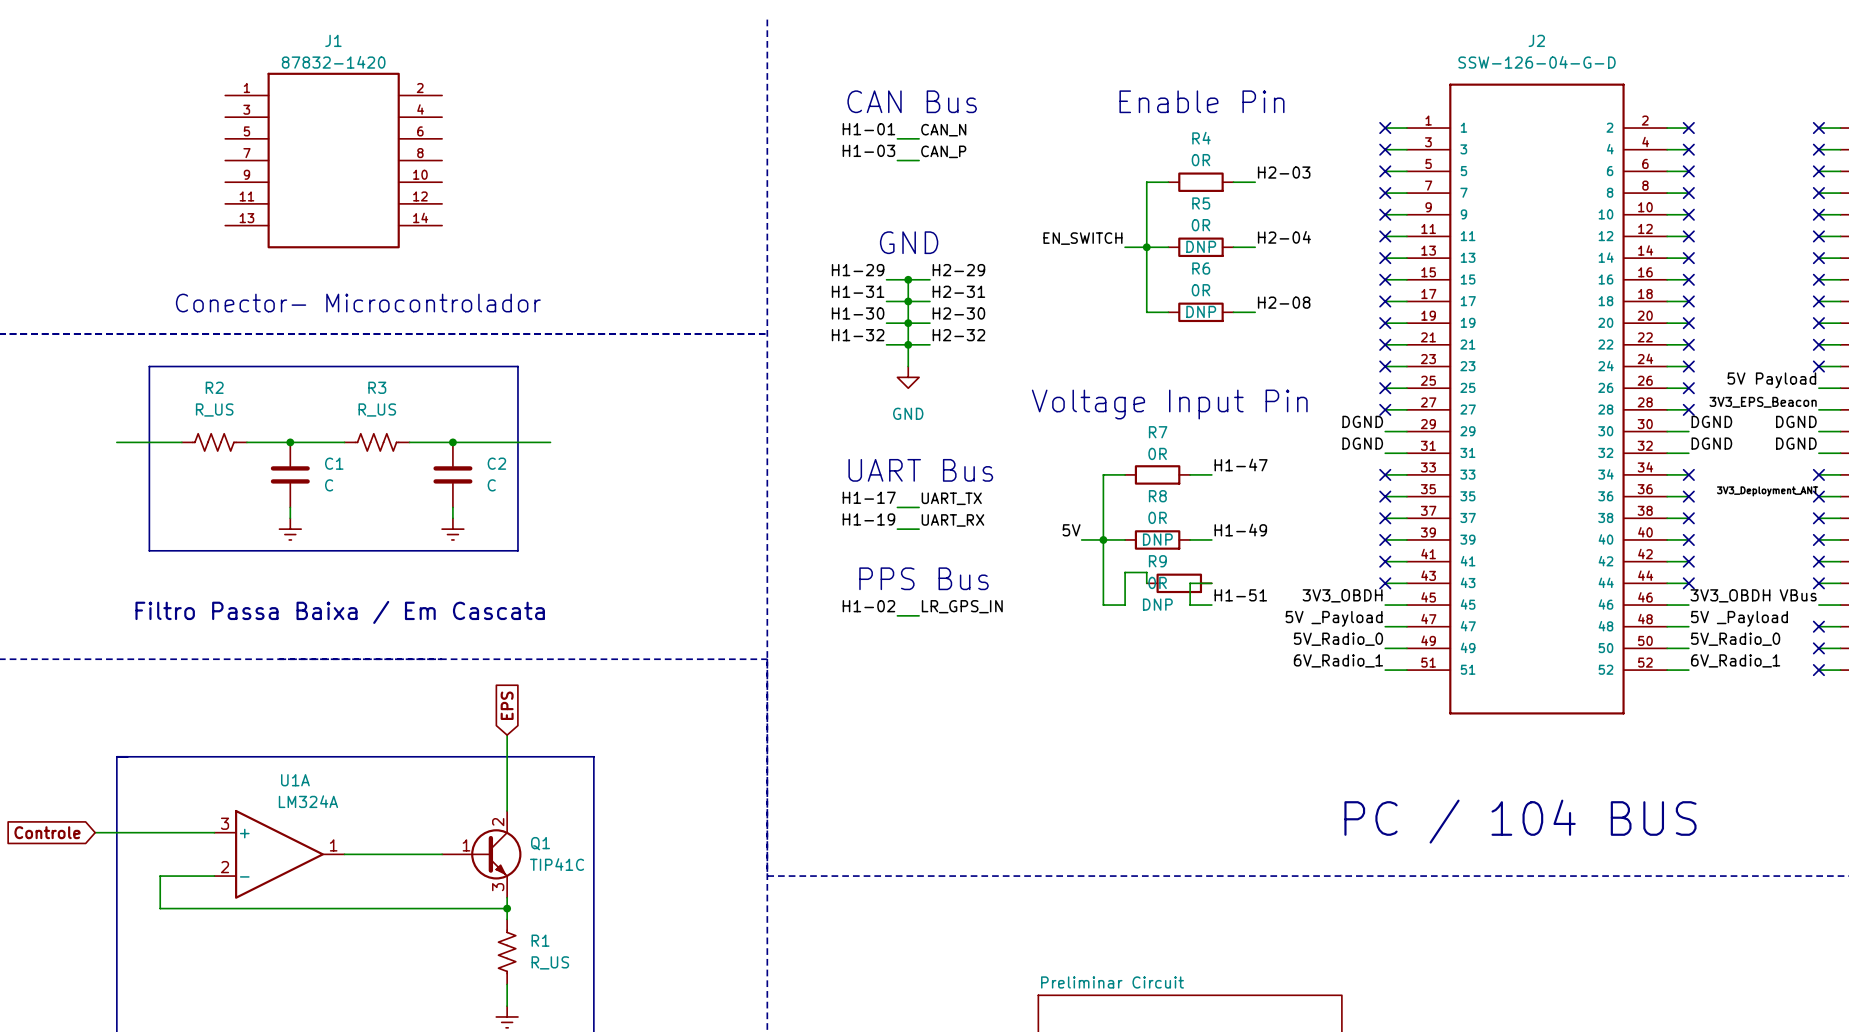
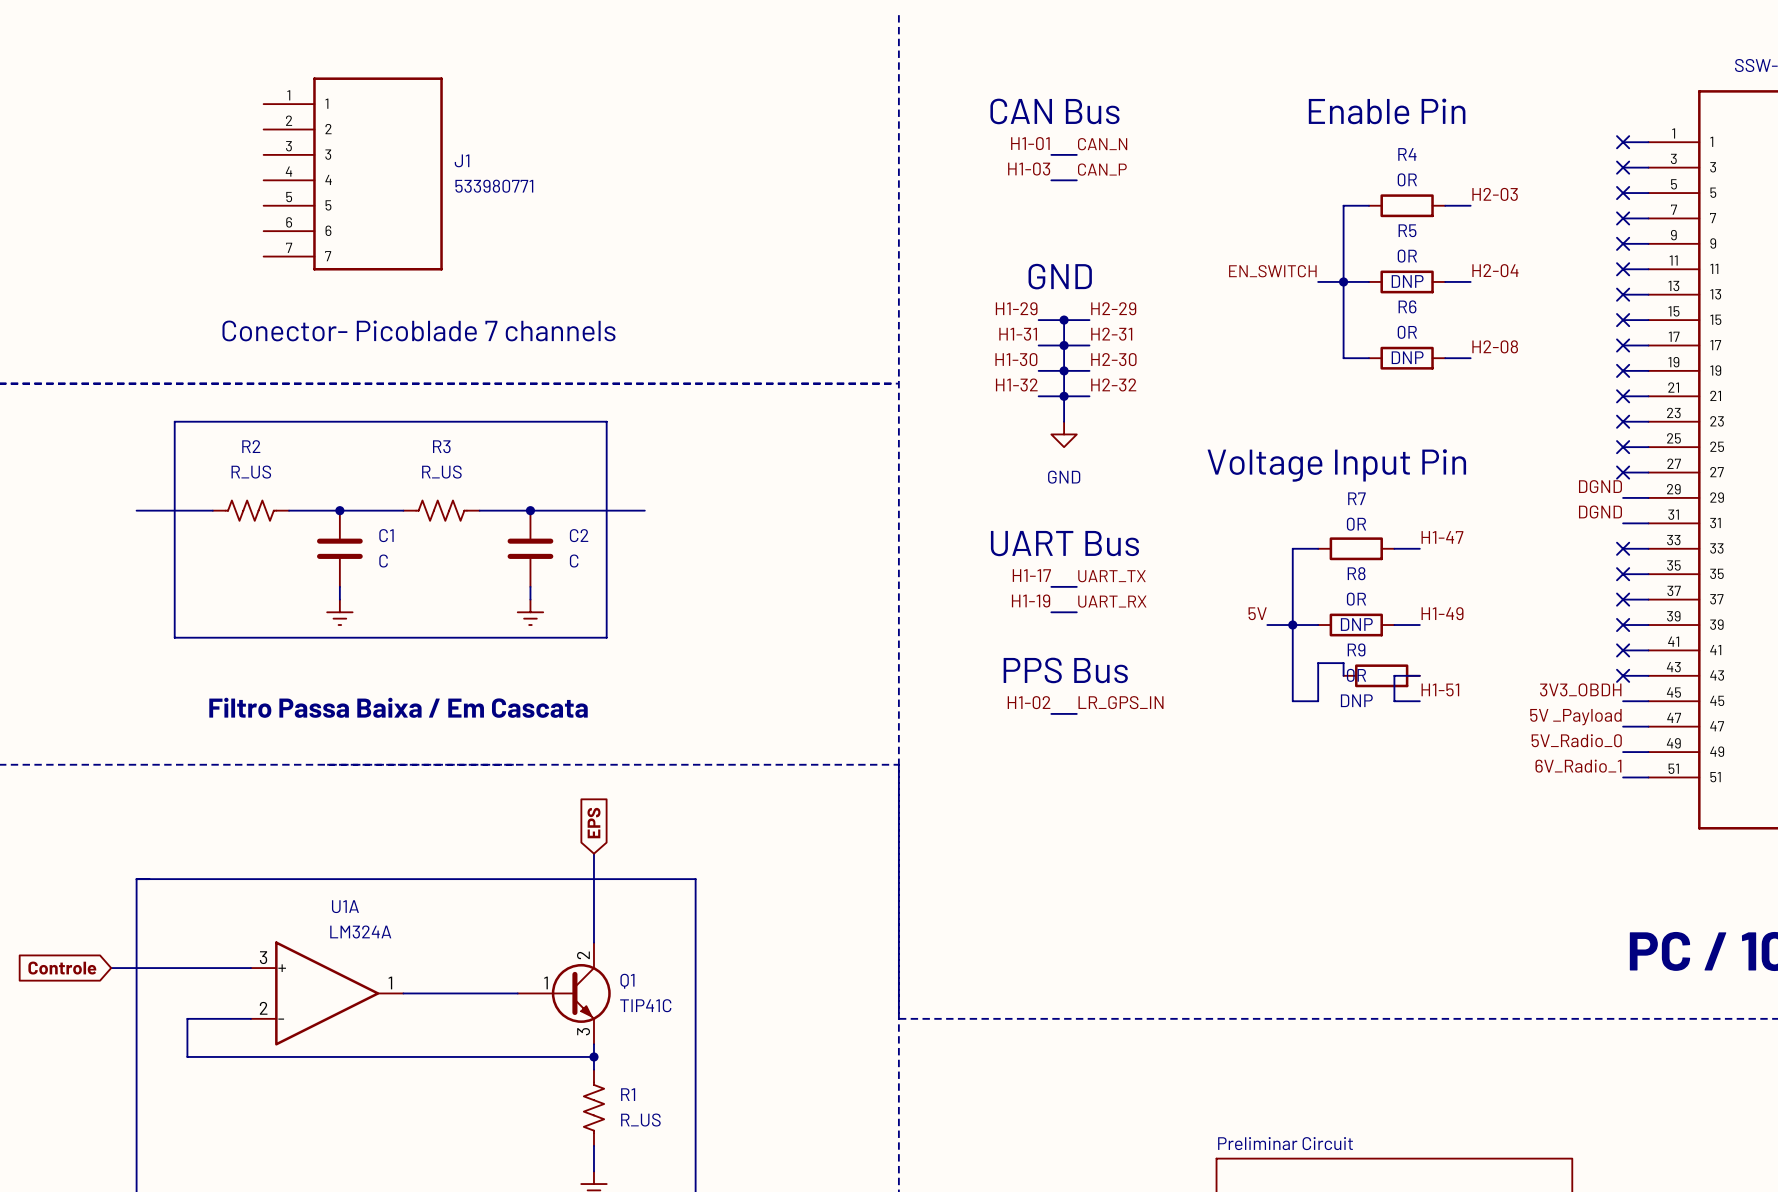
J1 name position: J1 (333, 40) -> J1 (462, 160)
J1 value: 87832-1420 (333, 62) -> 533980771 (494, 186)
J1 symbol: [225, 72, 443, 249] -> [263, 77, 443, 271]
text: none -> Conector- Picoblade 7 channels (418, 330)
text: Conector- Microcontrolador (358, 303) -> none

